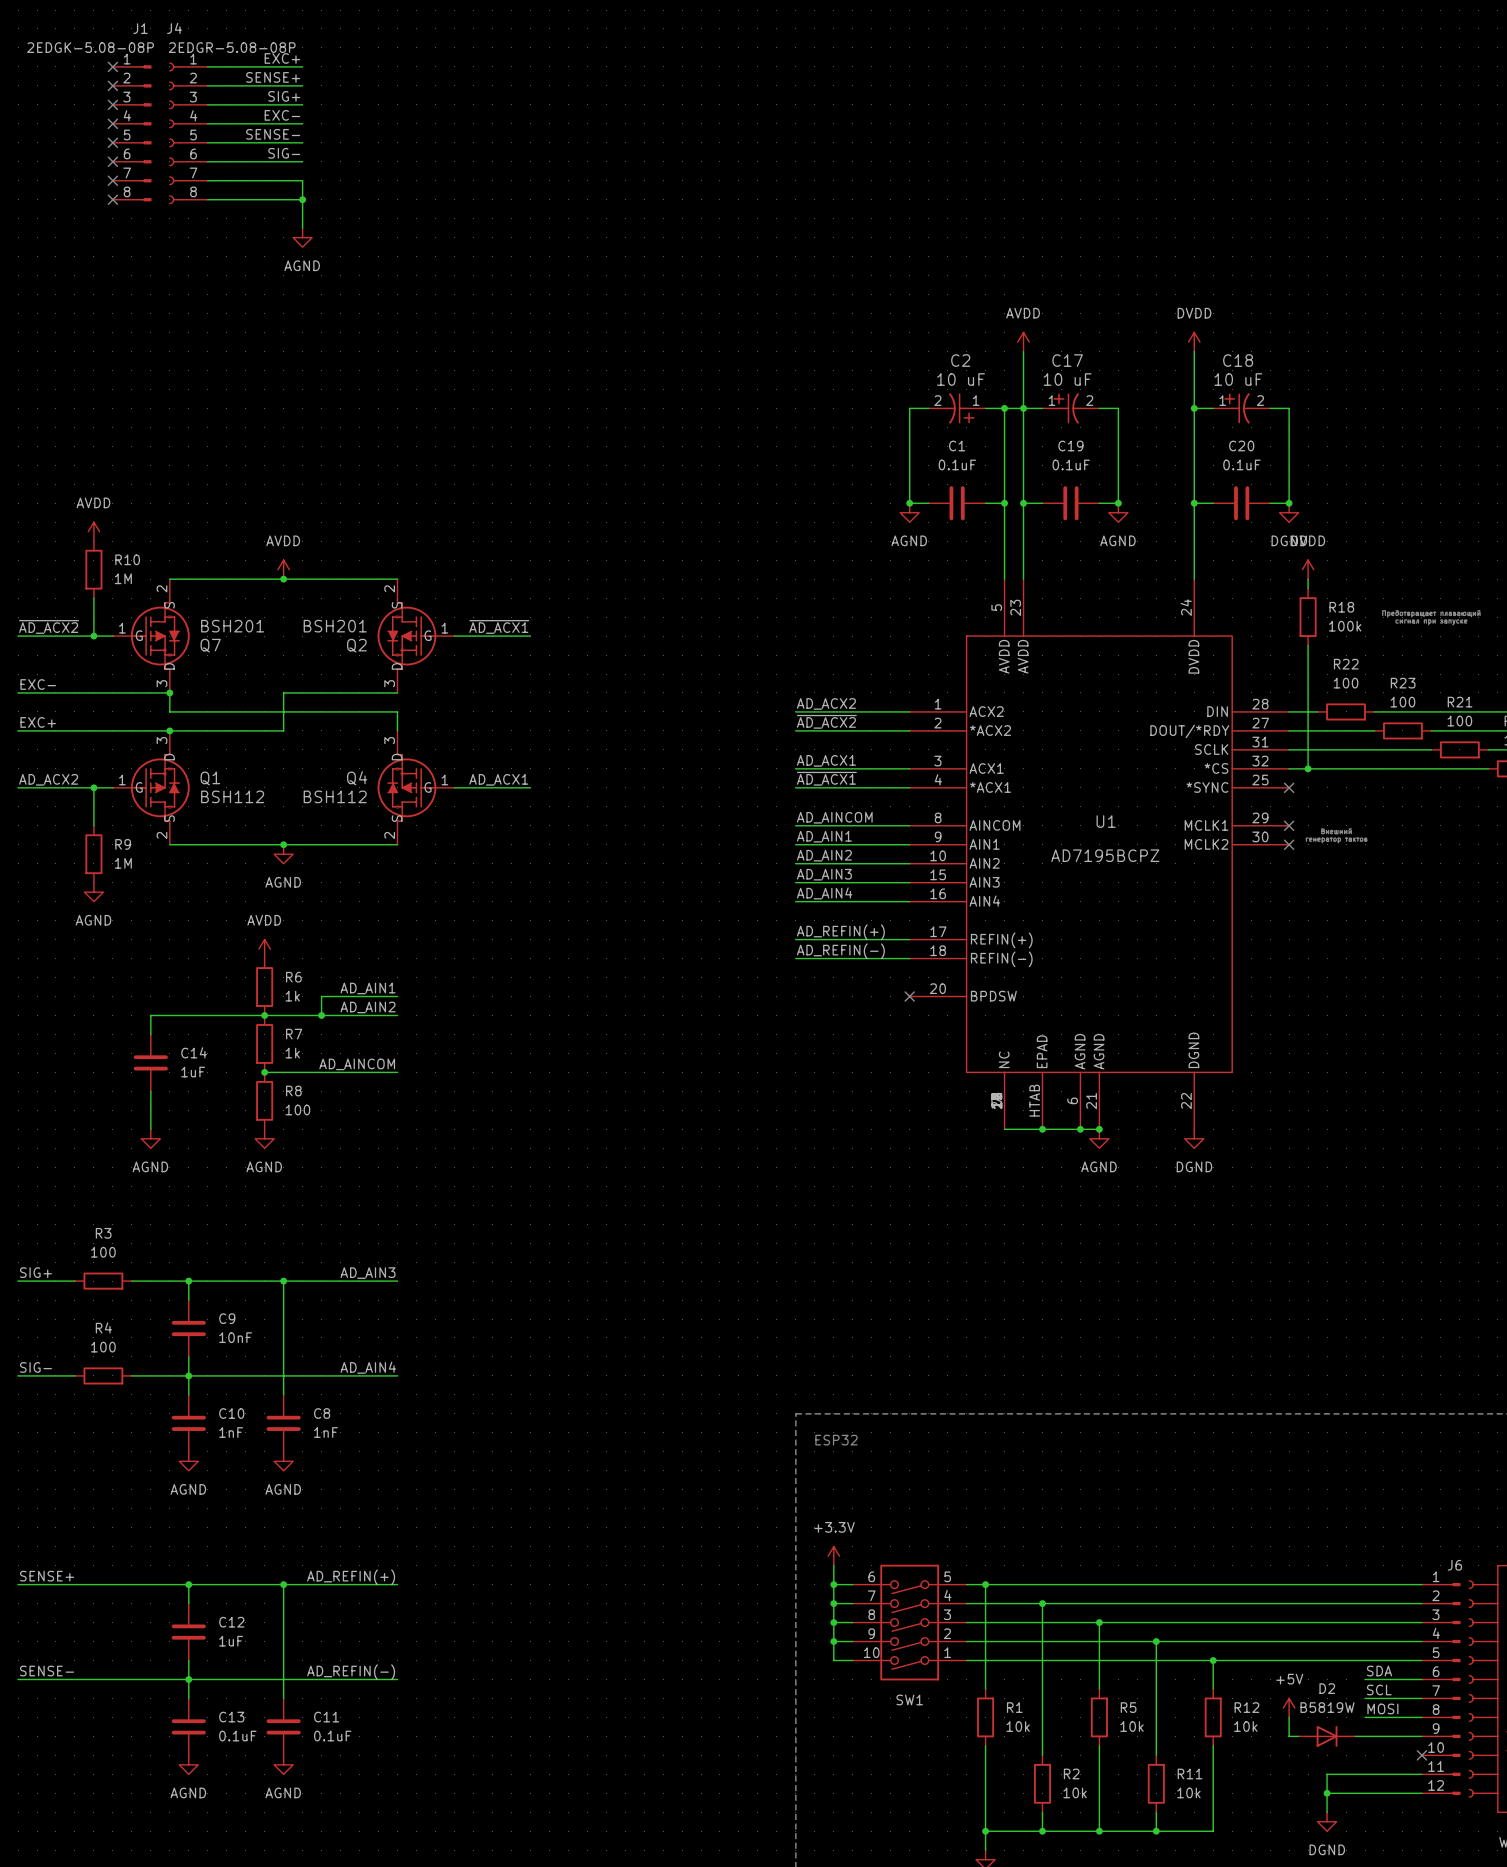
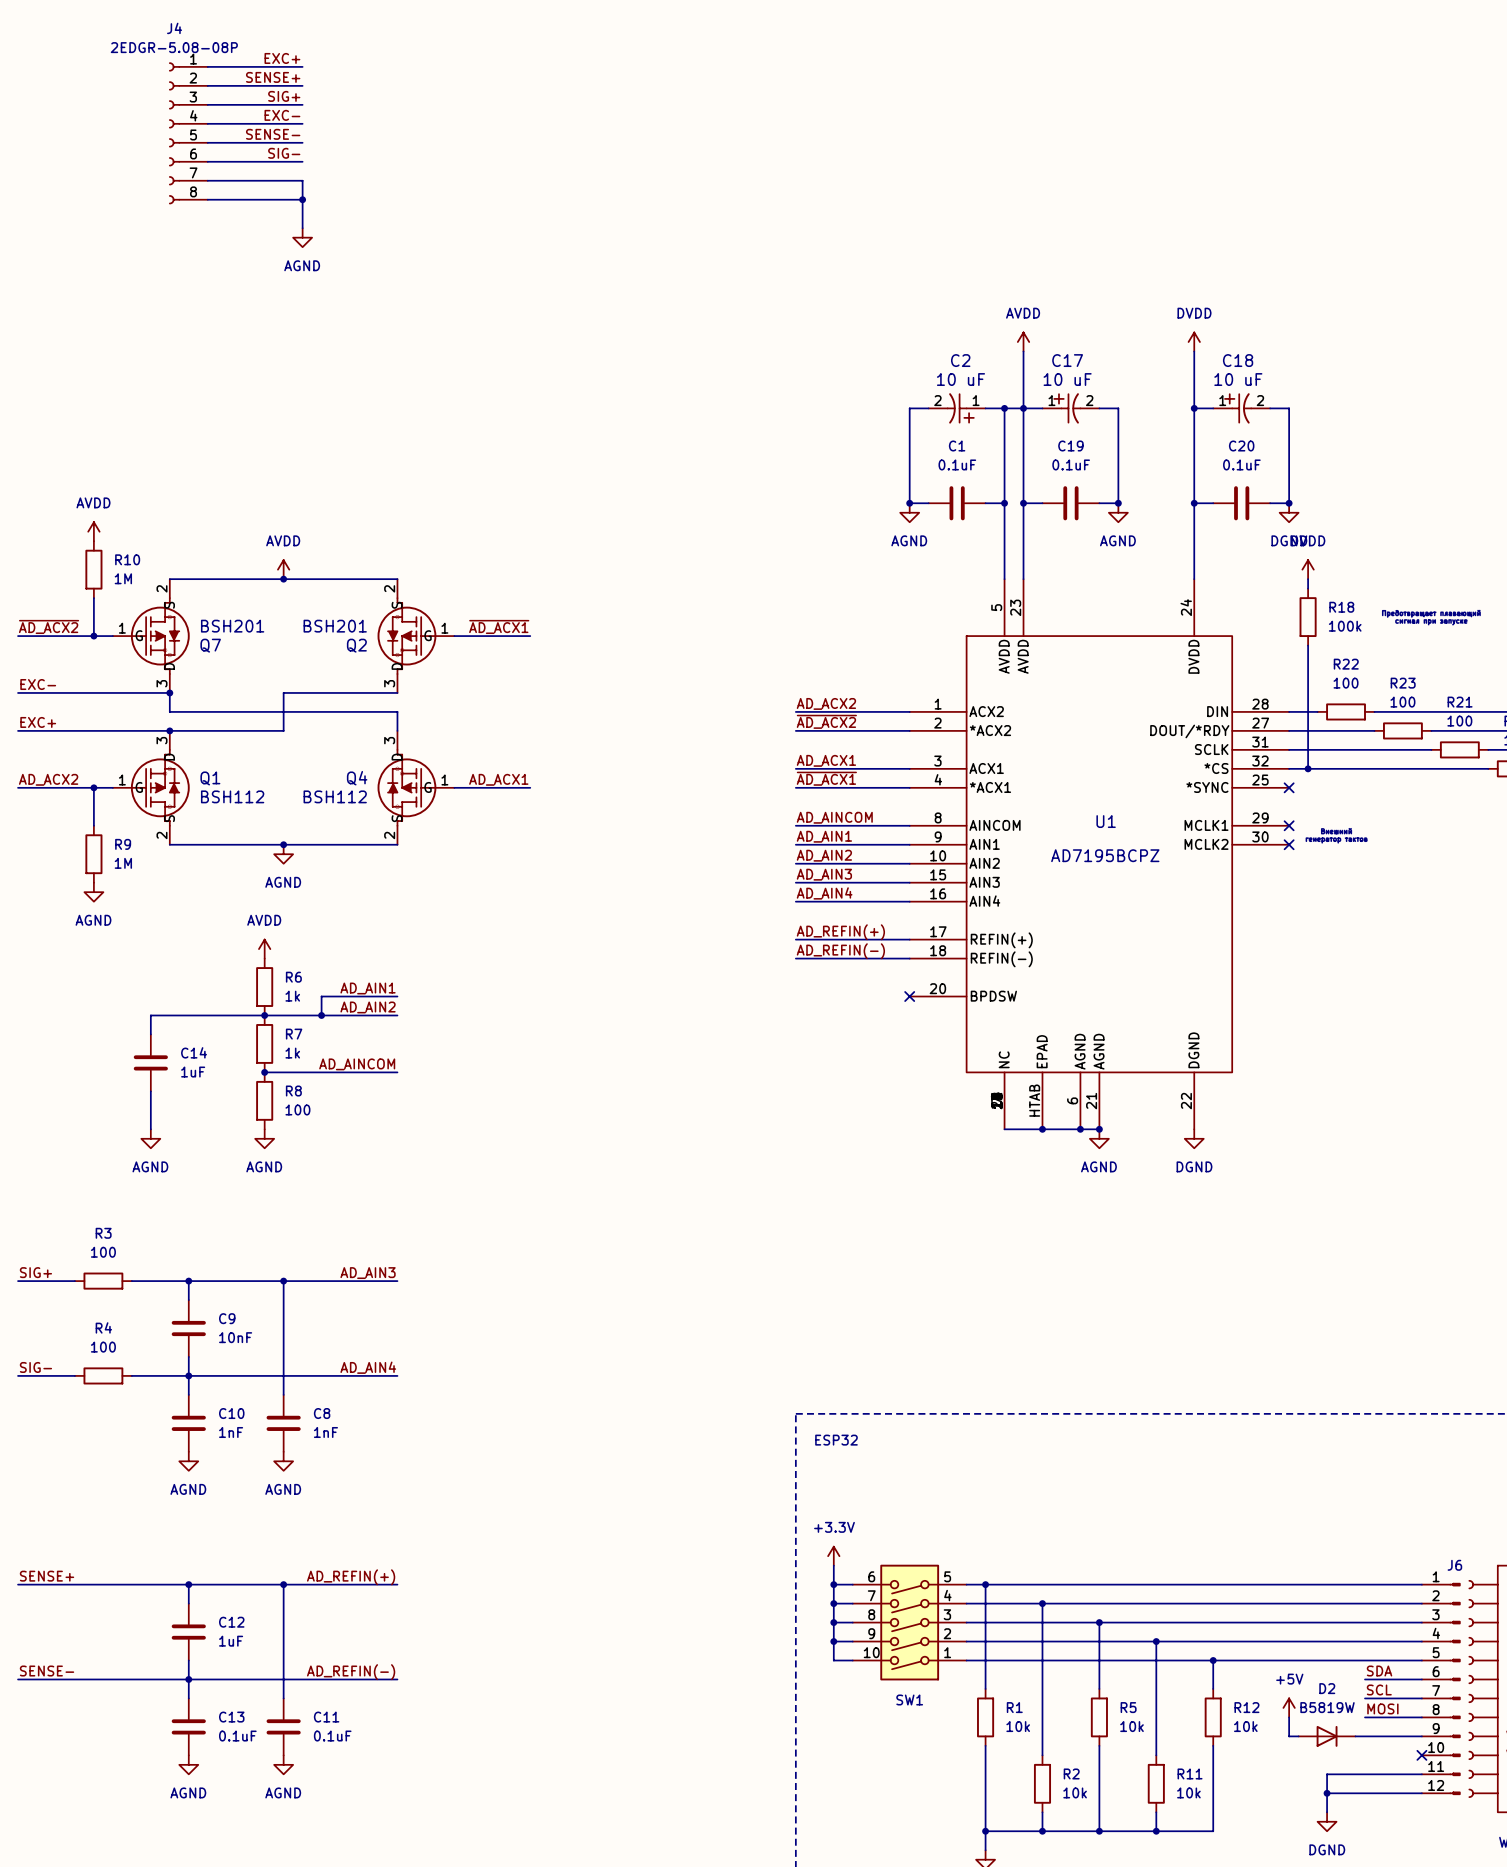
J4 value position: 2EDGR-5.08-08P (232, 47) -> 2EDGR-5.08-08P (174, 47)
no-connect mark: (112, 66) -> none
no-connect mark: (112, 85) -> none
no-connect mark: (112, 104) -> none
no-connect mark: (112, 123) -> none
J1: 2EDGK-5.08-08P (132, 133) -> none
no-connect mark: (112, 142) -> none
no-connect mark: (112, 161) -> none
no-connect mark: (112, 180) -> none
no-connect mark: (112, 199) -> none

